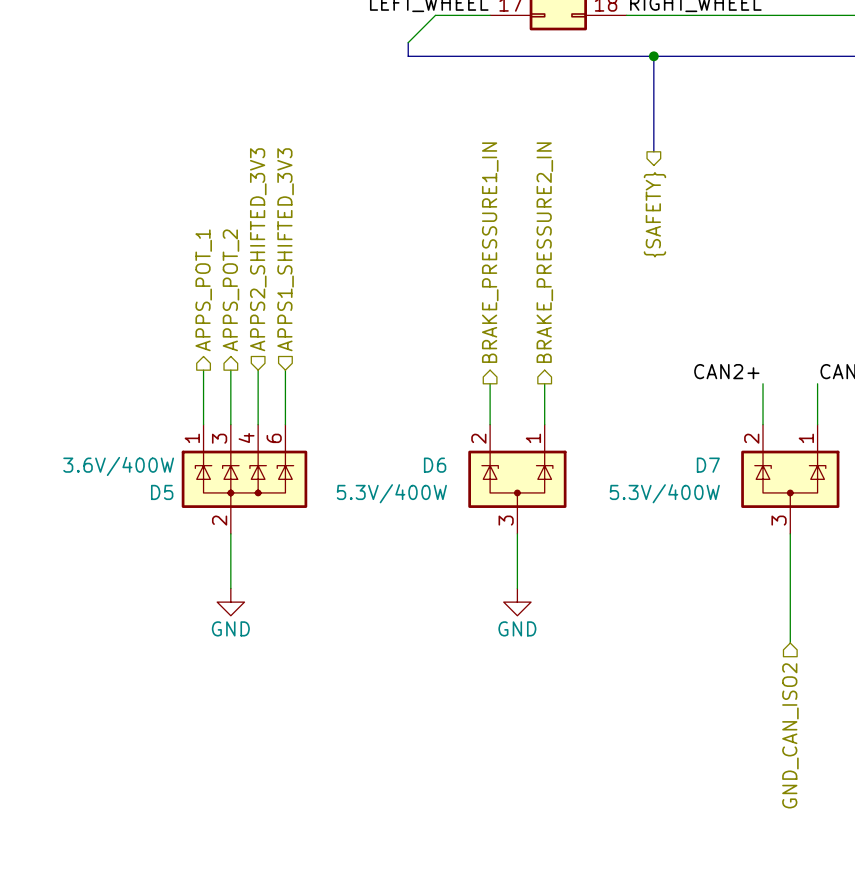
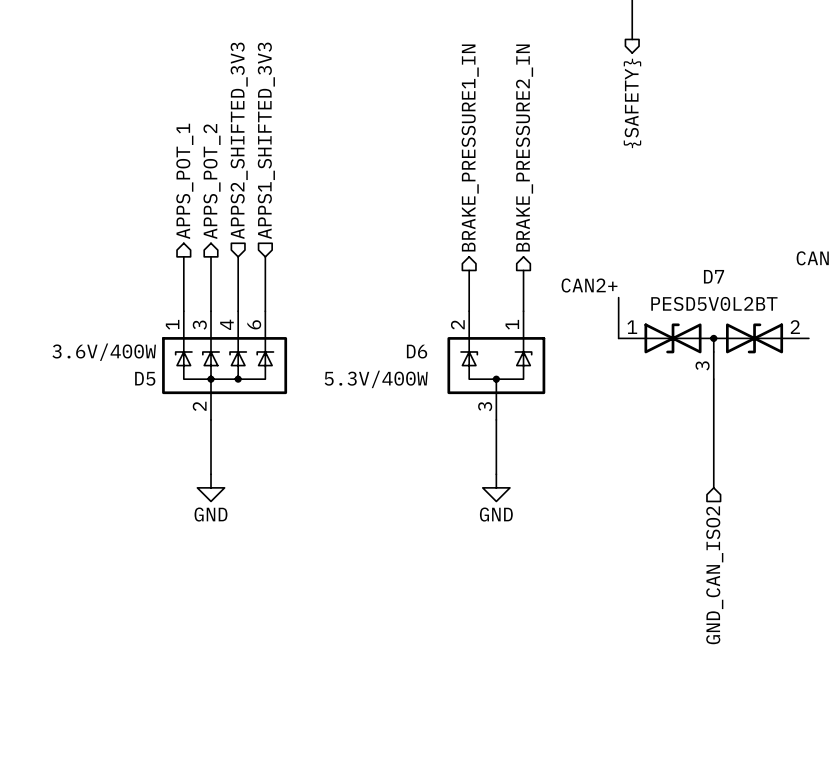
label position: CAN2+ (726, 371) -> CAN2+ (589, 285)
wire: (763, 383) (763, 424) -> (618, 297) (618, 338)
wire: (817, 383) (817, 424) -> none
D7 symbol: [741, 424, 840, 534] -> [618, 323, 809, 380]
D7 name position: D7 (708, 465) -> D7 (714, 276)
D7 value: 5.3V/400W (664, 493) -> PESD5V0L2BT (714, 303)
wire: (790, 533) (790, 643) -> (713, 379) (713, 487)
hierarchical label position: GND_CAN_ISO2 (790, 735) -> GND_CAN_ISO2 (714, 575)

